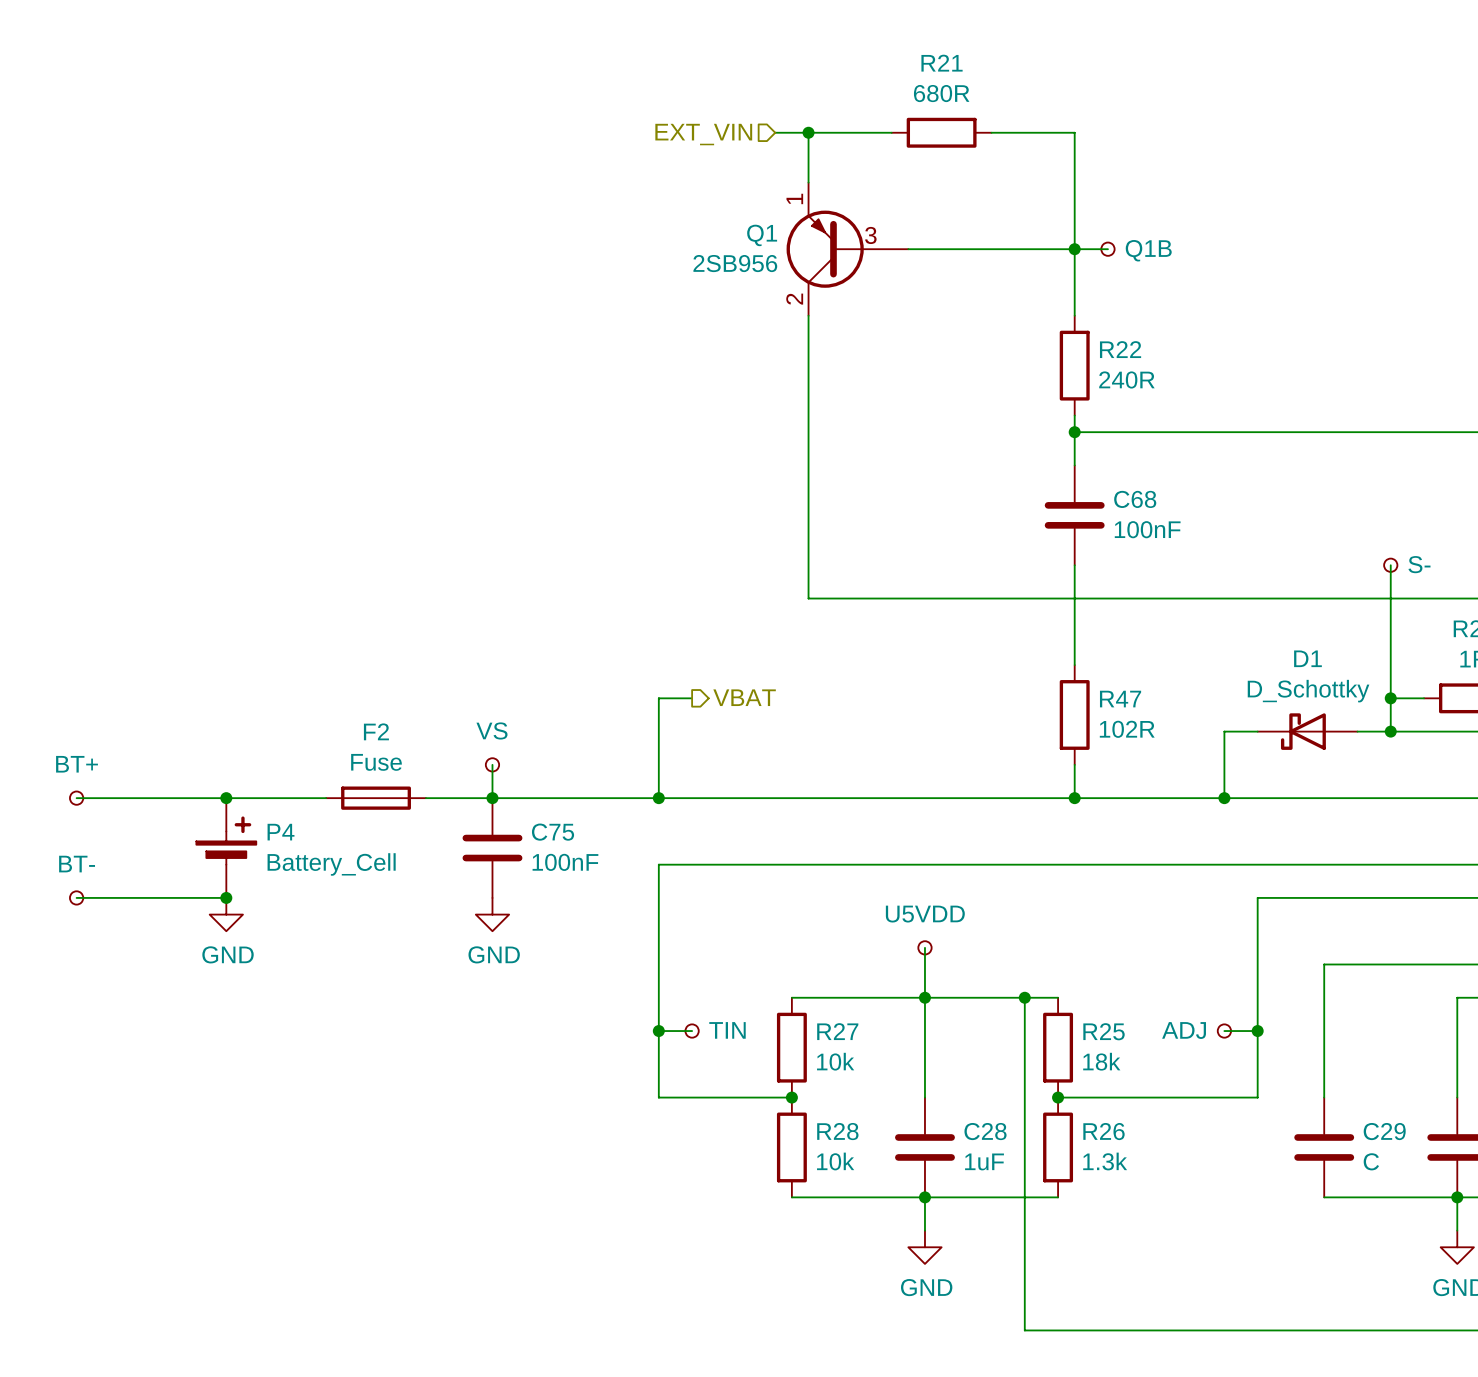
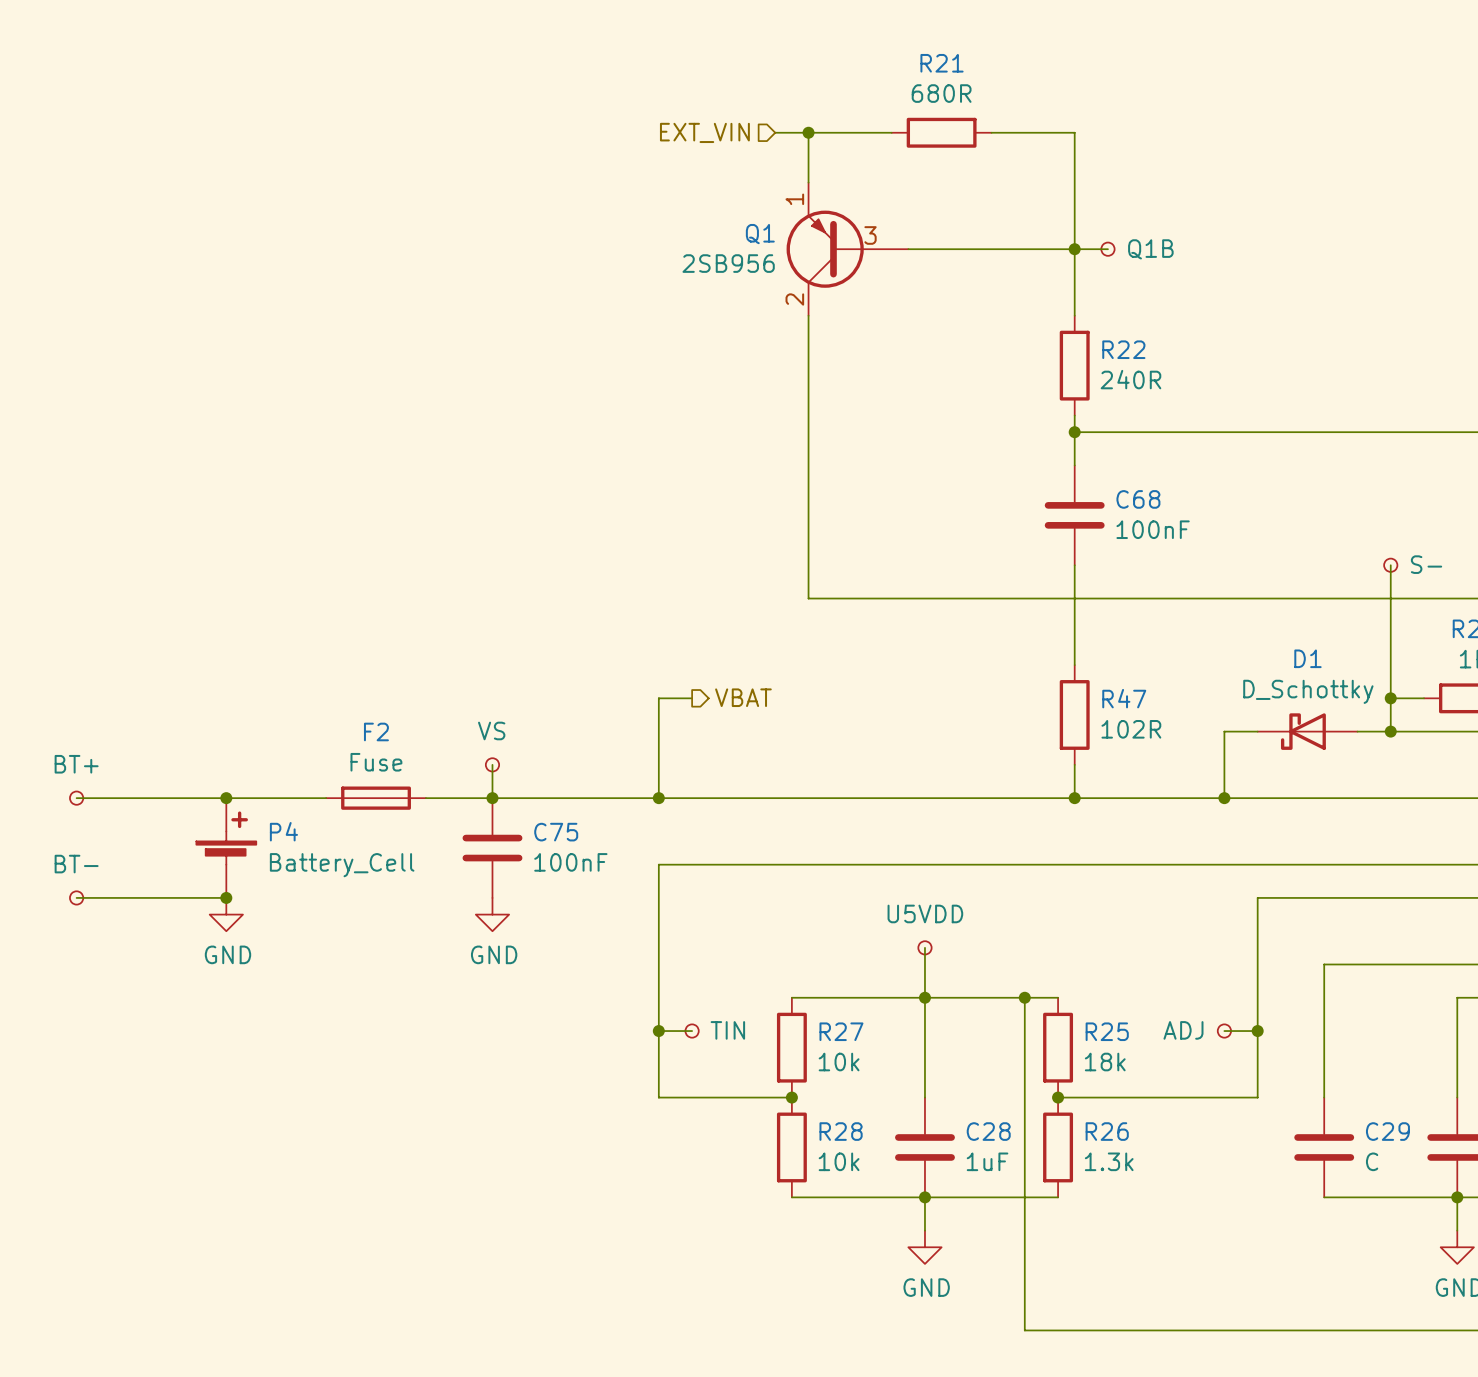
P4 symbol: [196, 798, 257, 898] -> [196, 798, 257, 898]

